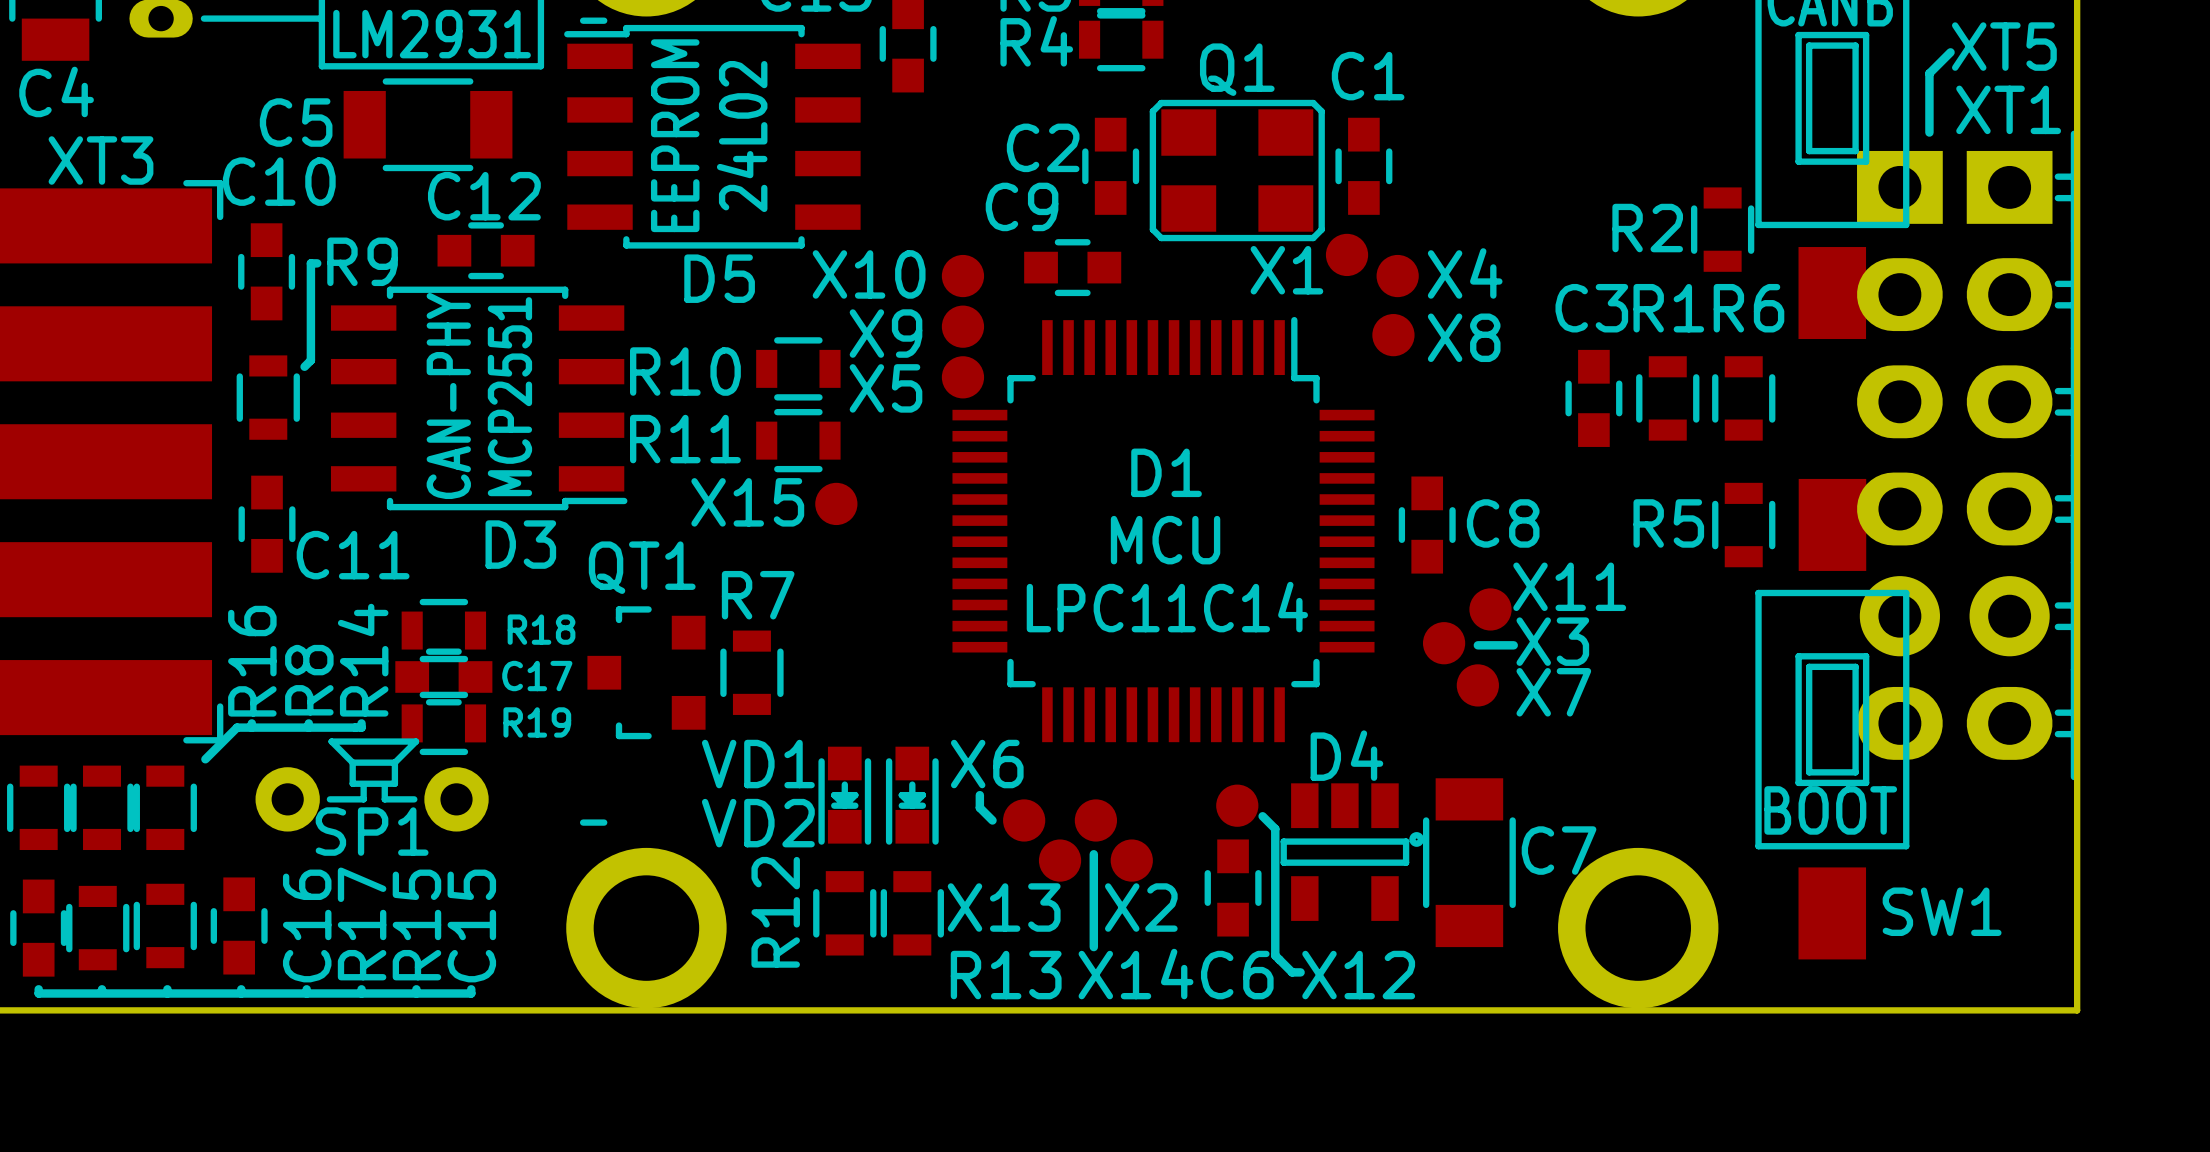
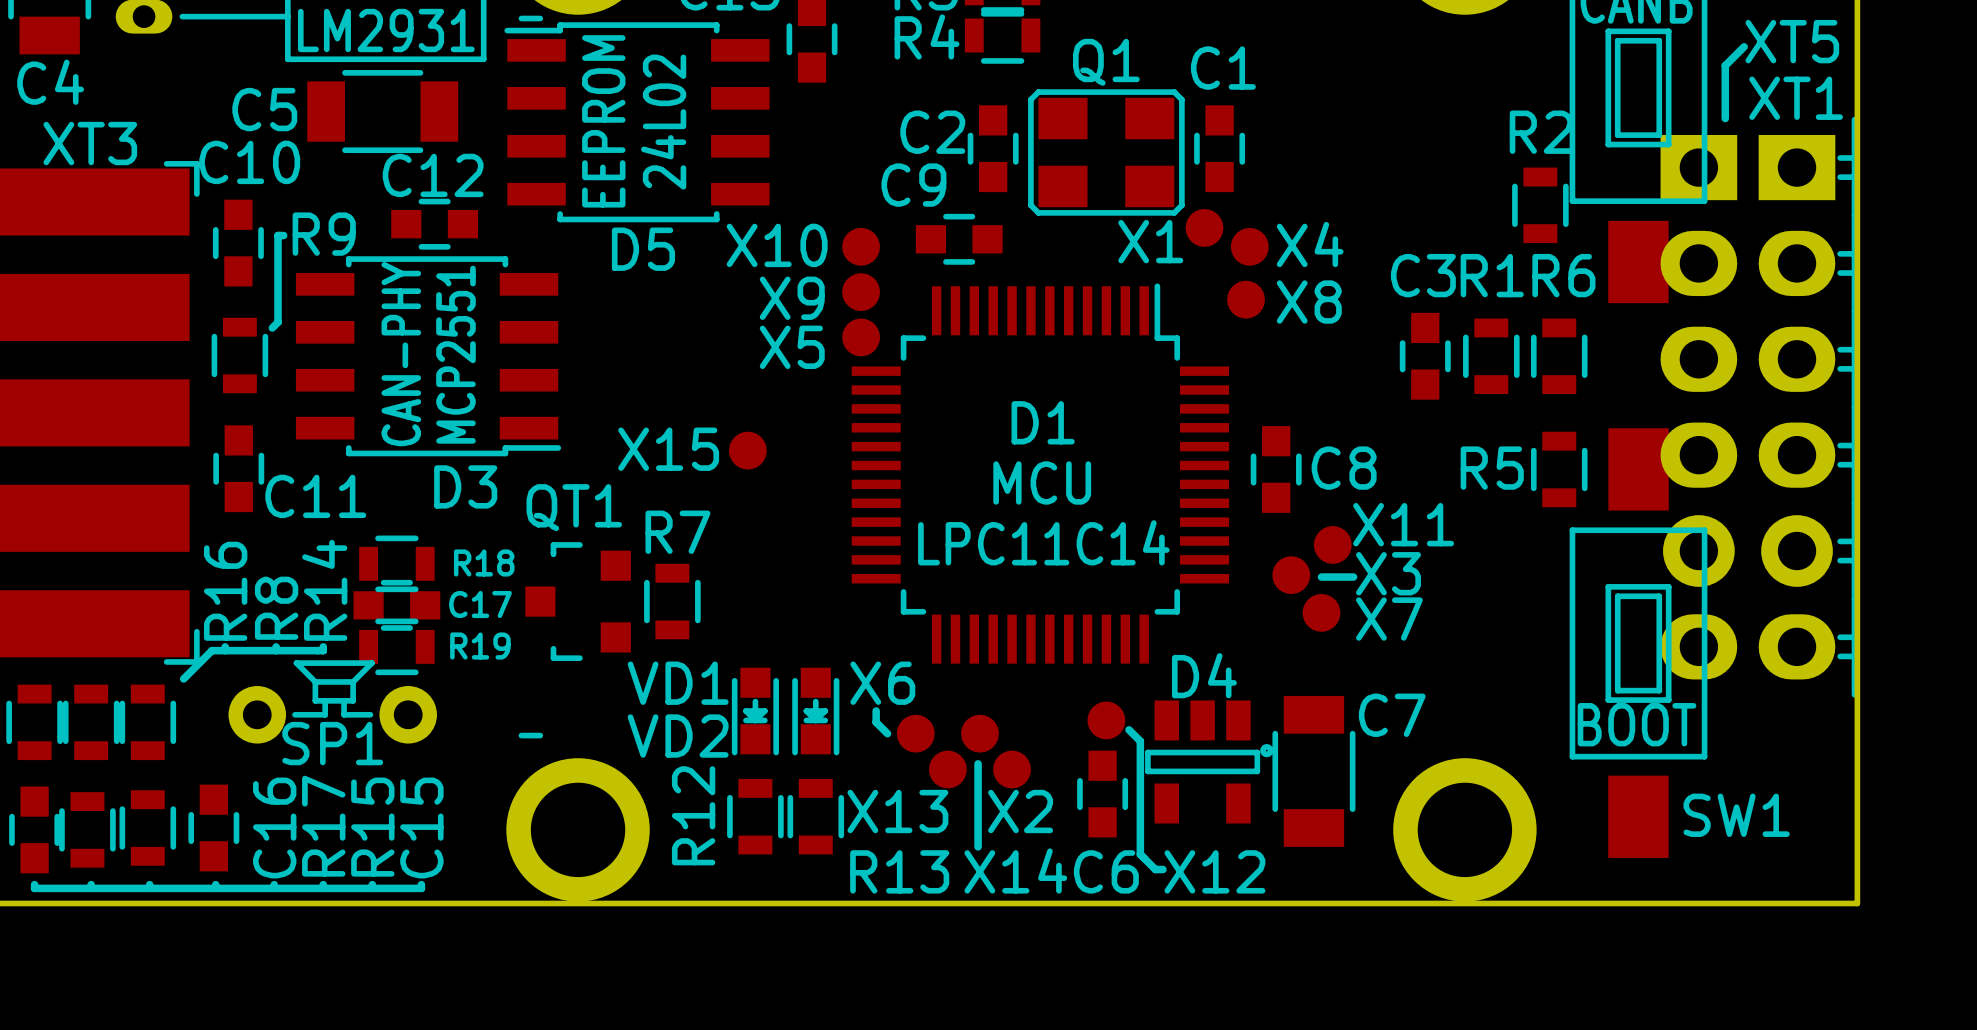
R2 name position: R2 (1647, 228) -> R2 (1541, 132)
R10: (798, 368) -> none
R11: (798, 440) -> none
C7 name position: C7 (1559, 850) -> C7 (1392, 715)

